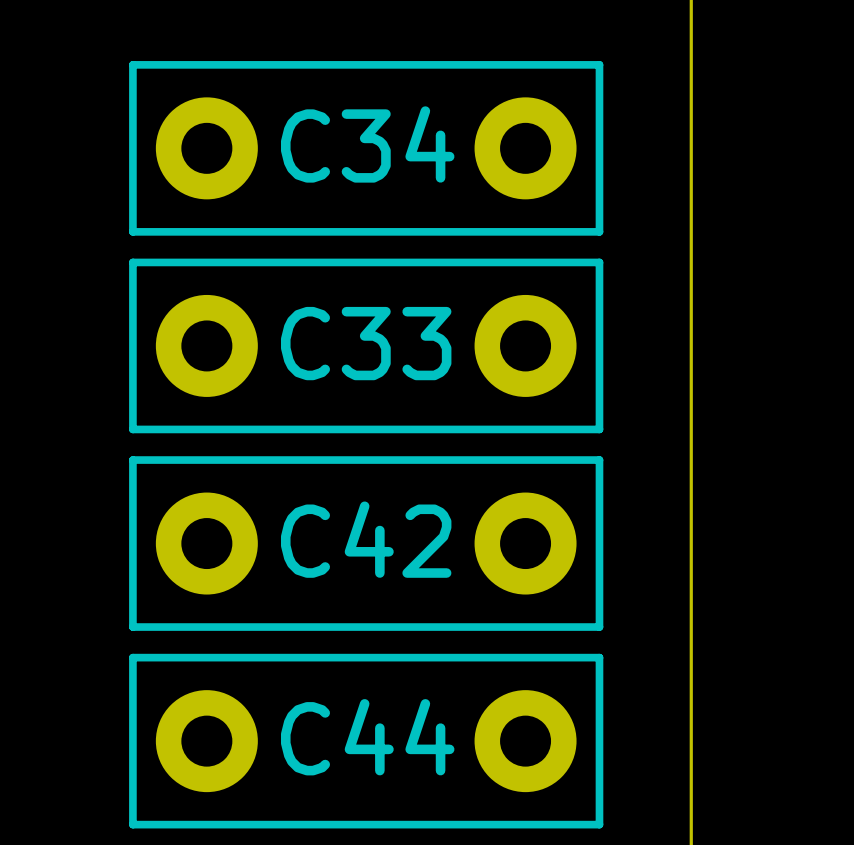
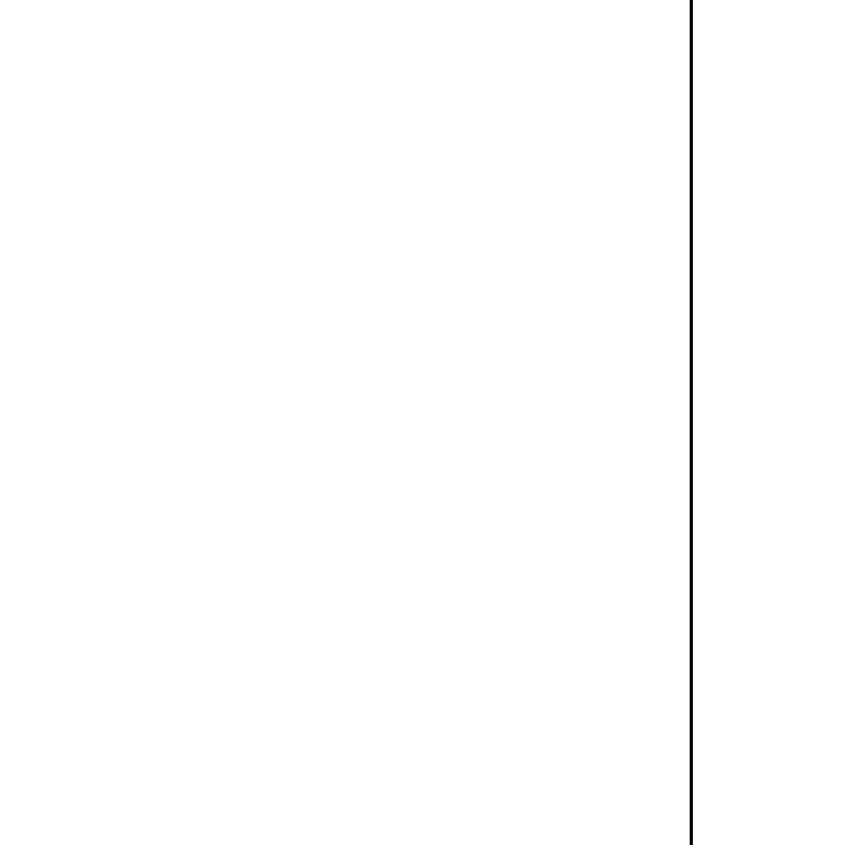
C34: (366, 148) -> none
C33: (366, 345) -> none
C42: (366, 543) -> none
C44: (366, 741) -> none

